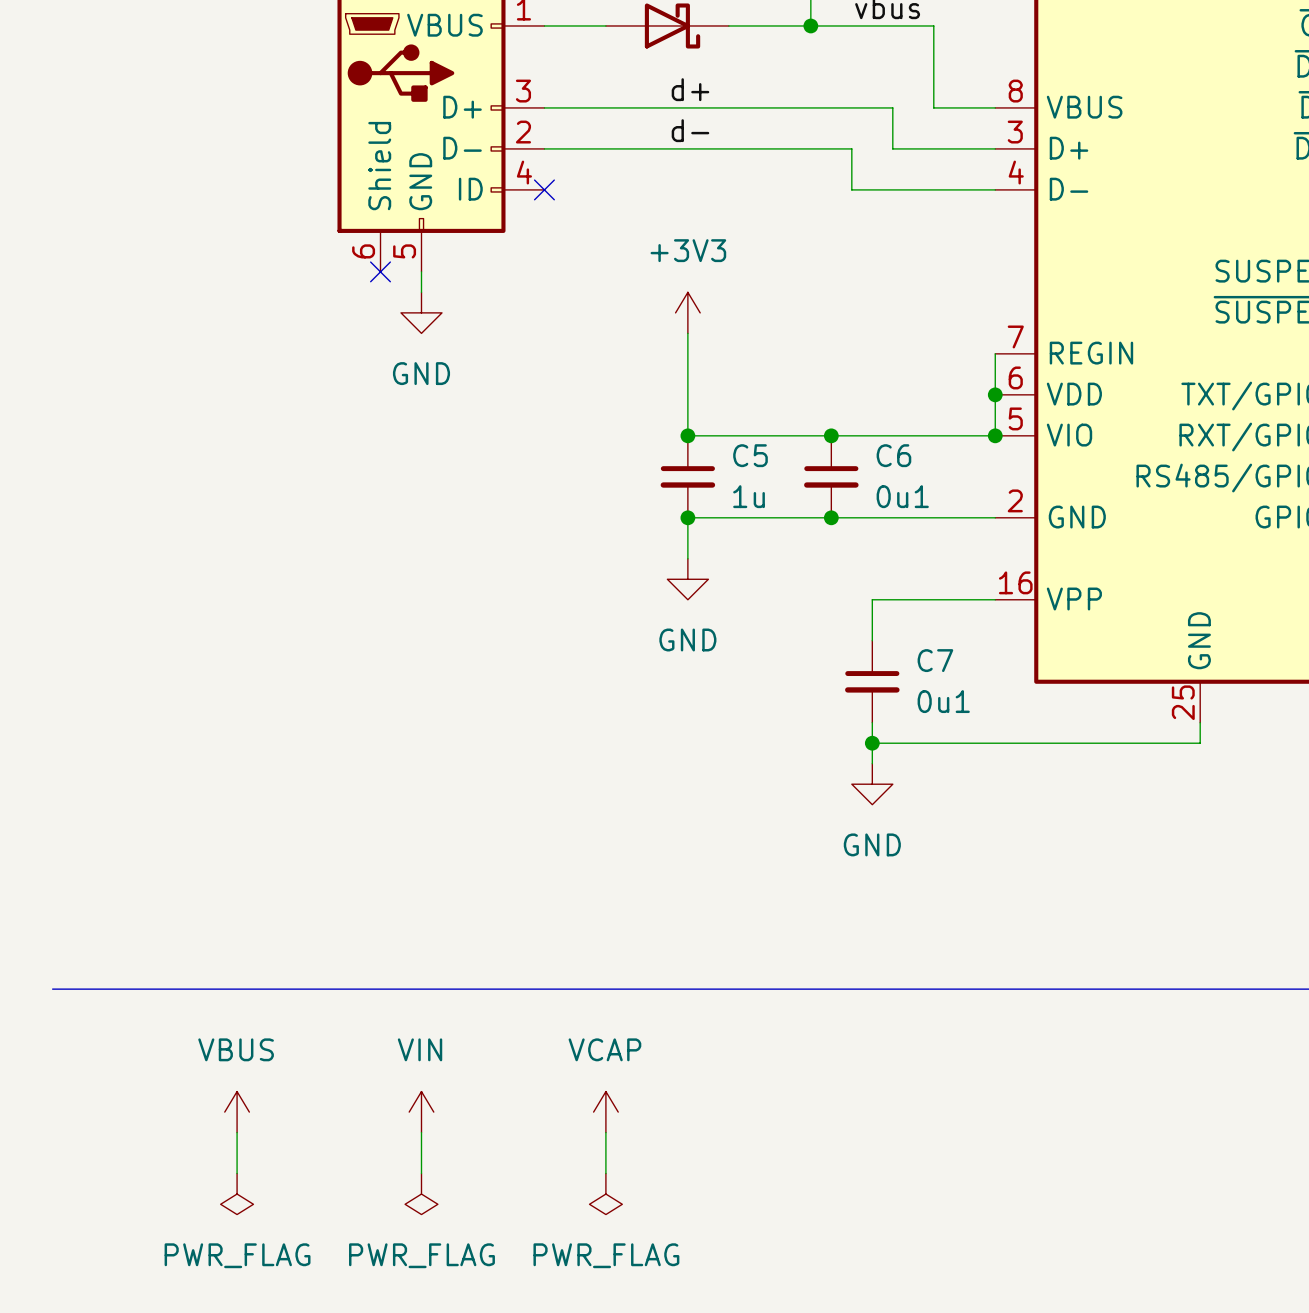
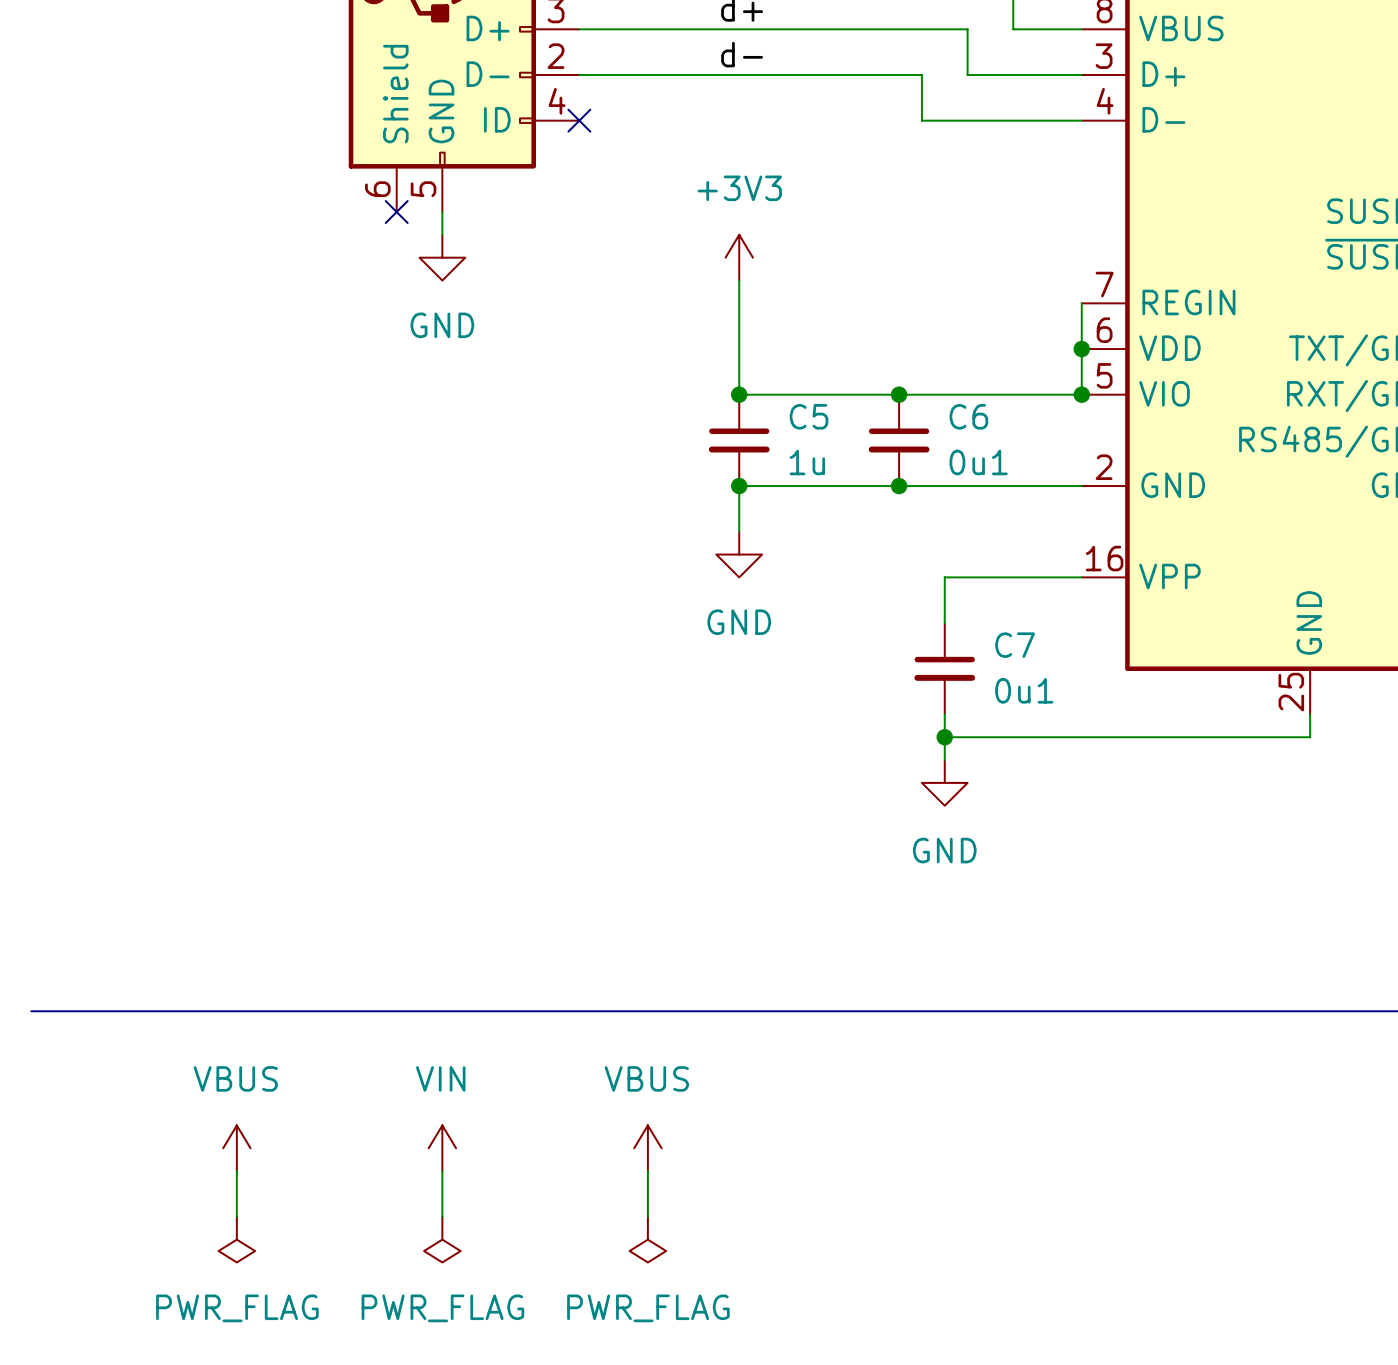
power symbol: VCAP (605, 1112) -> VBUS (647, 1148)

